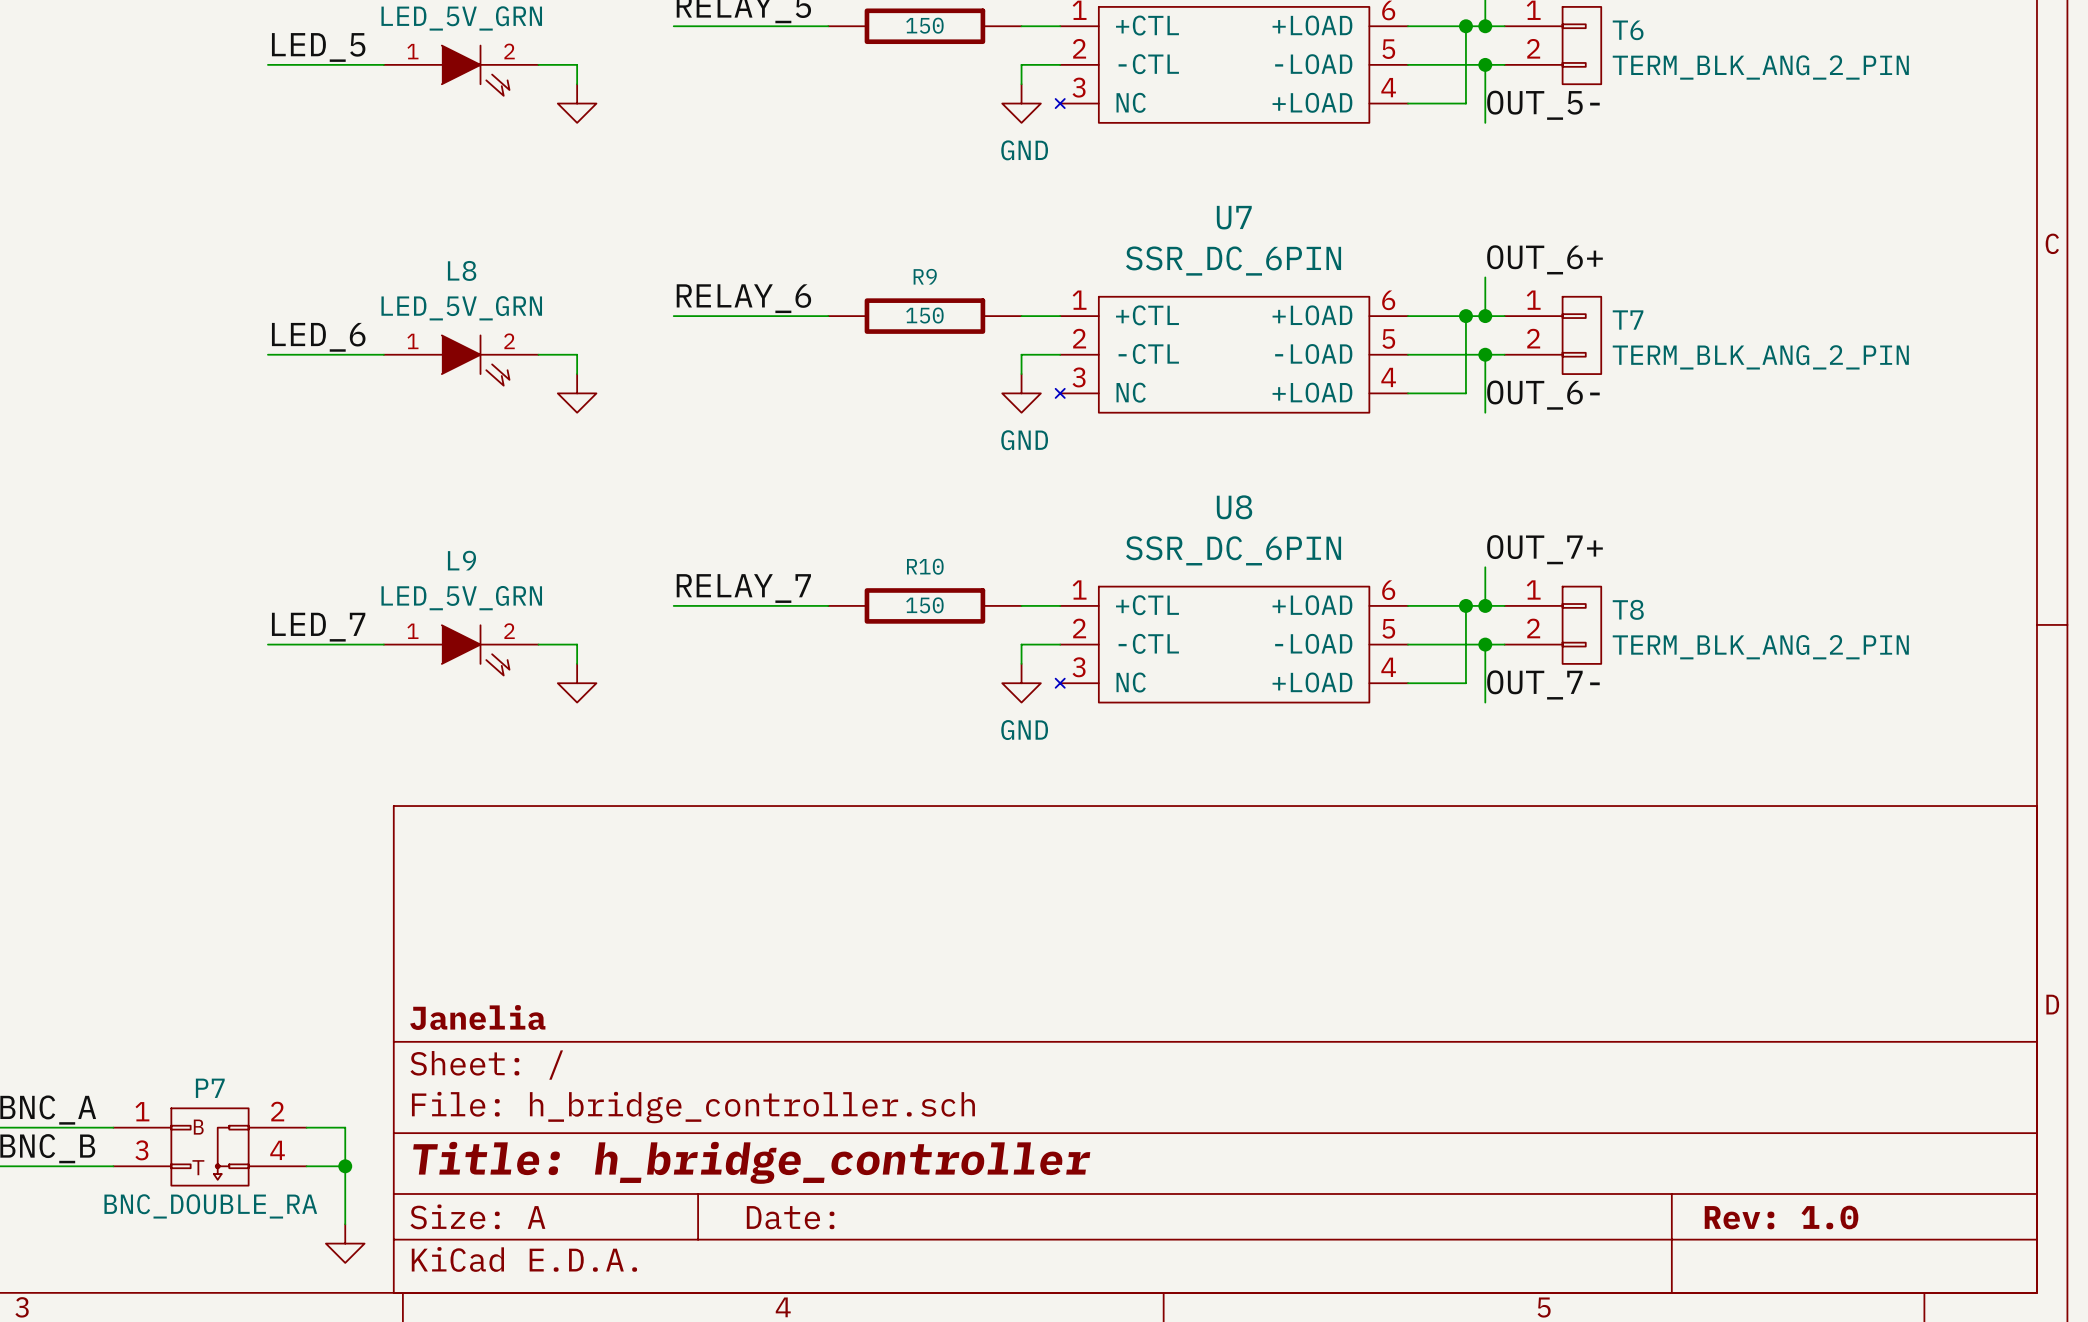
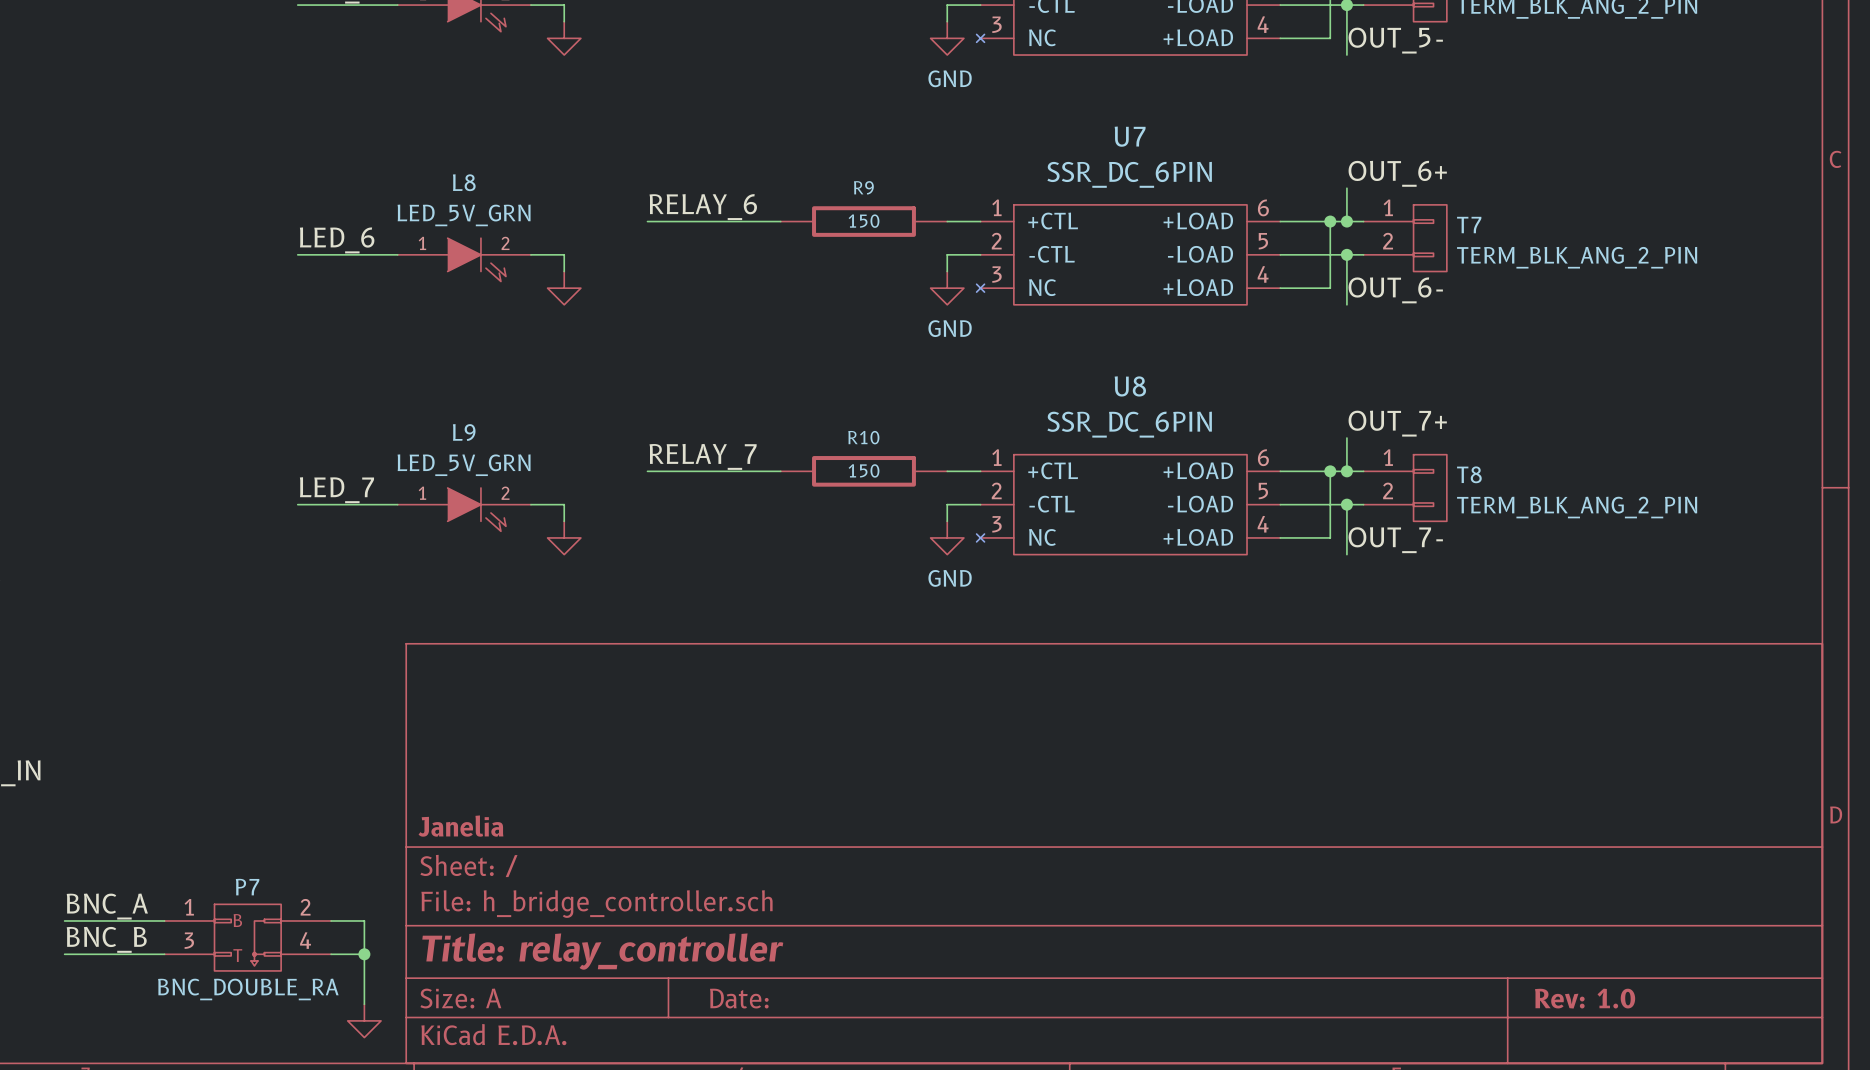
title block: Title: h_bridge_controller (751, 1162) -> Title: relay_controller (602, 951)

